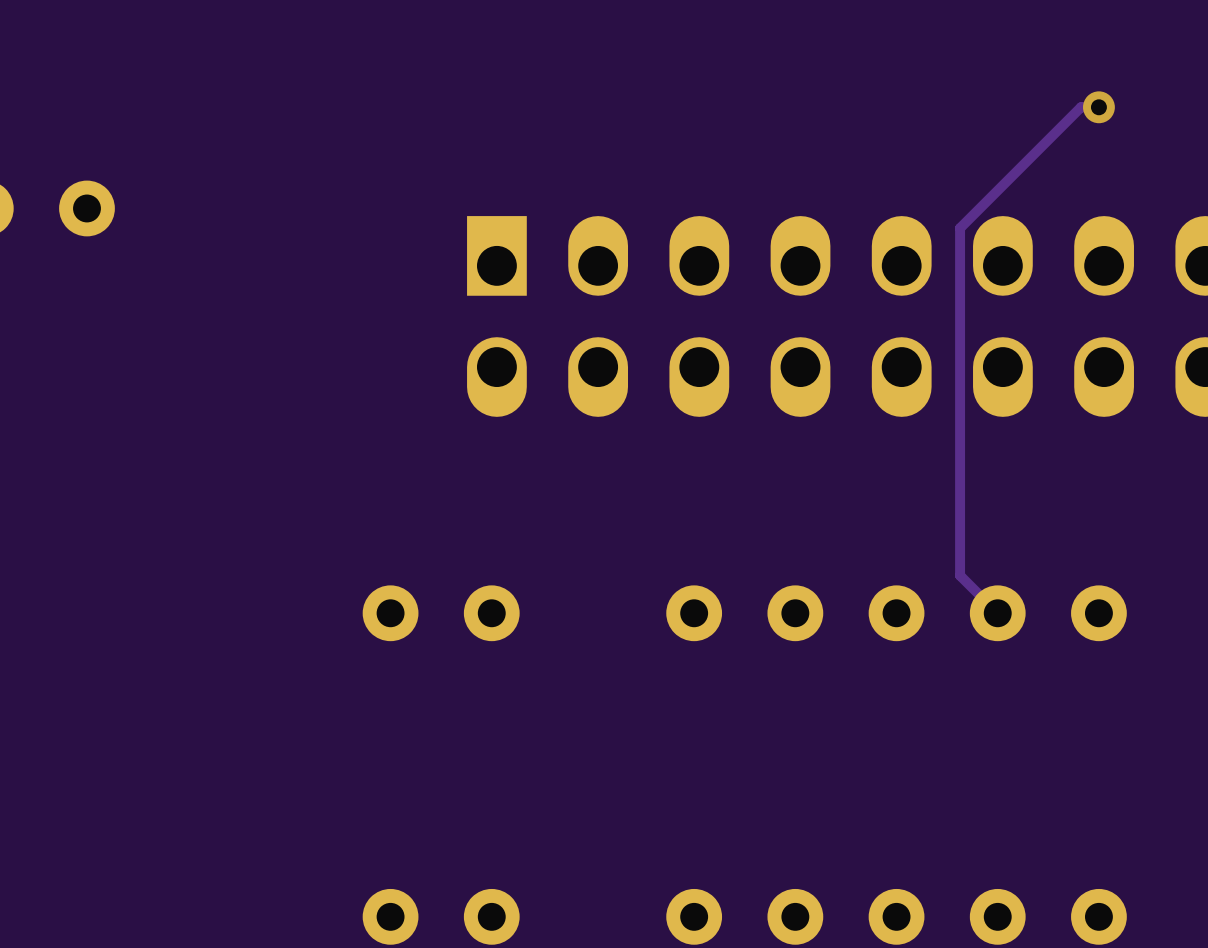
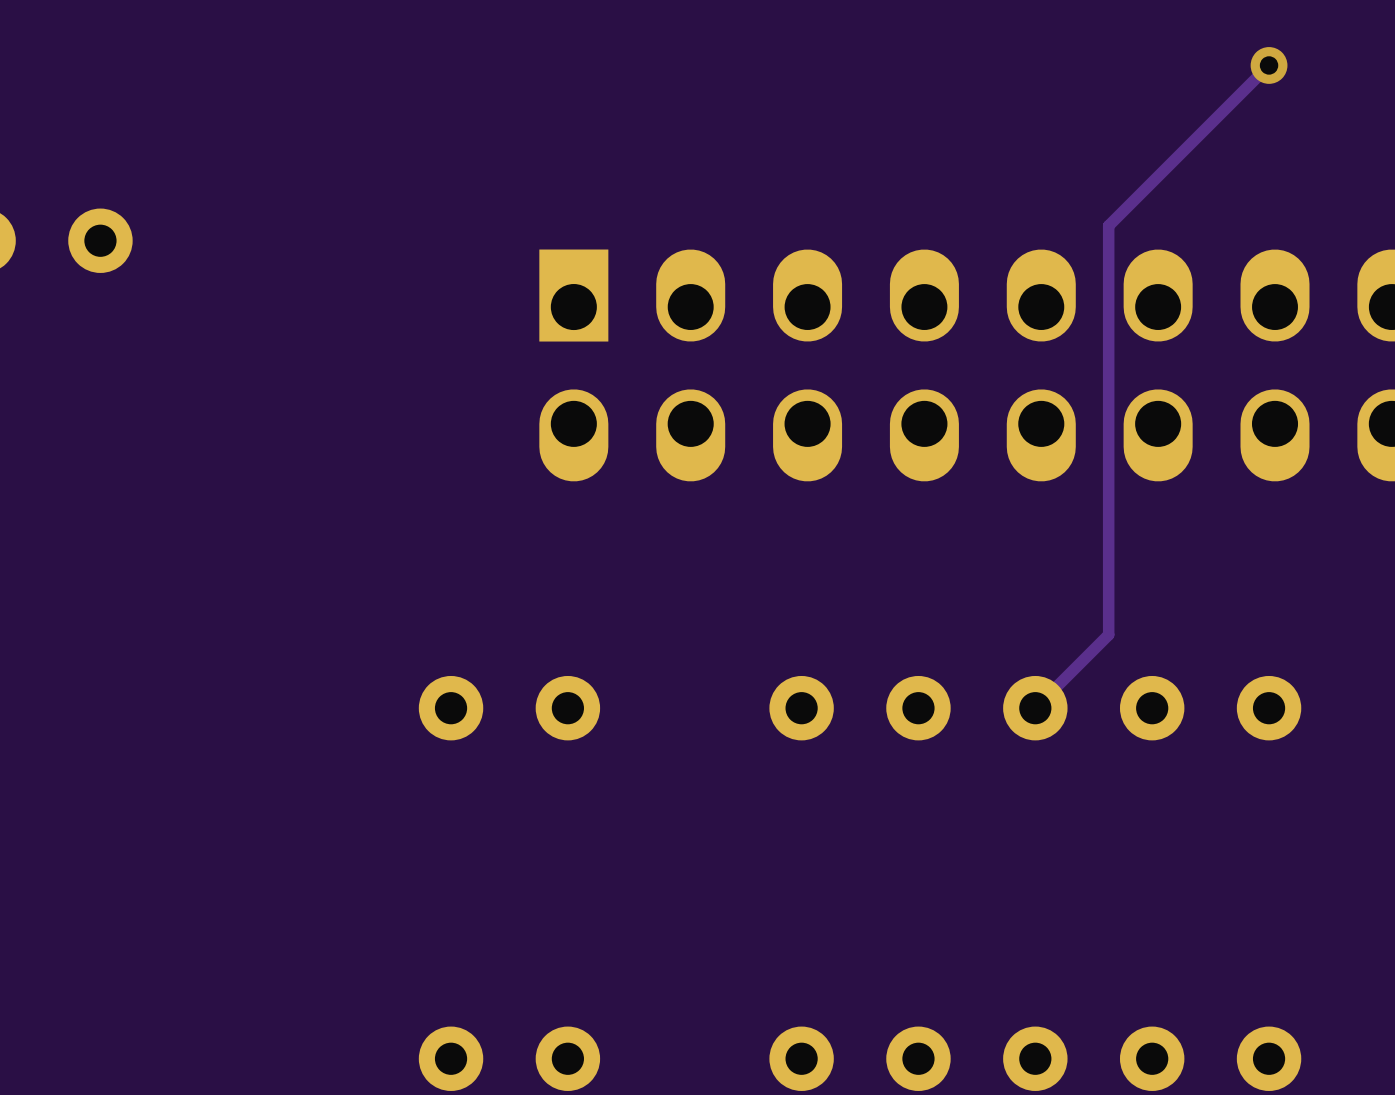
track: (1098, 107) (1081, 107) (960, 228) -> (1269, 65) (1108, 225) (1108, 263)
via position: (1098, 107) -> (1269, 65)
track: (960, 549) (960, 575) (997, 613) -> (1108, 634) (1035, 708)

